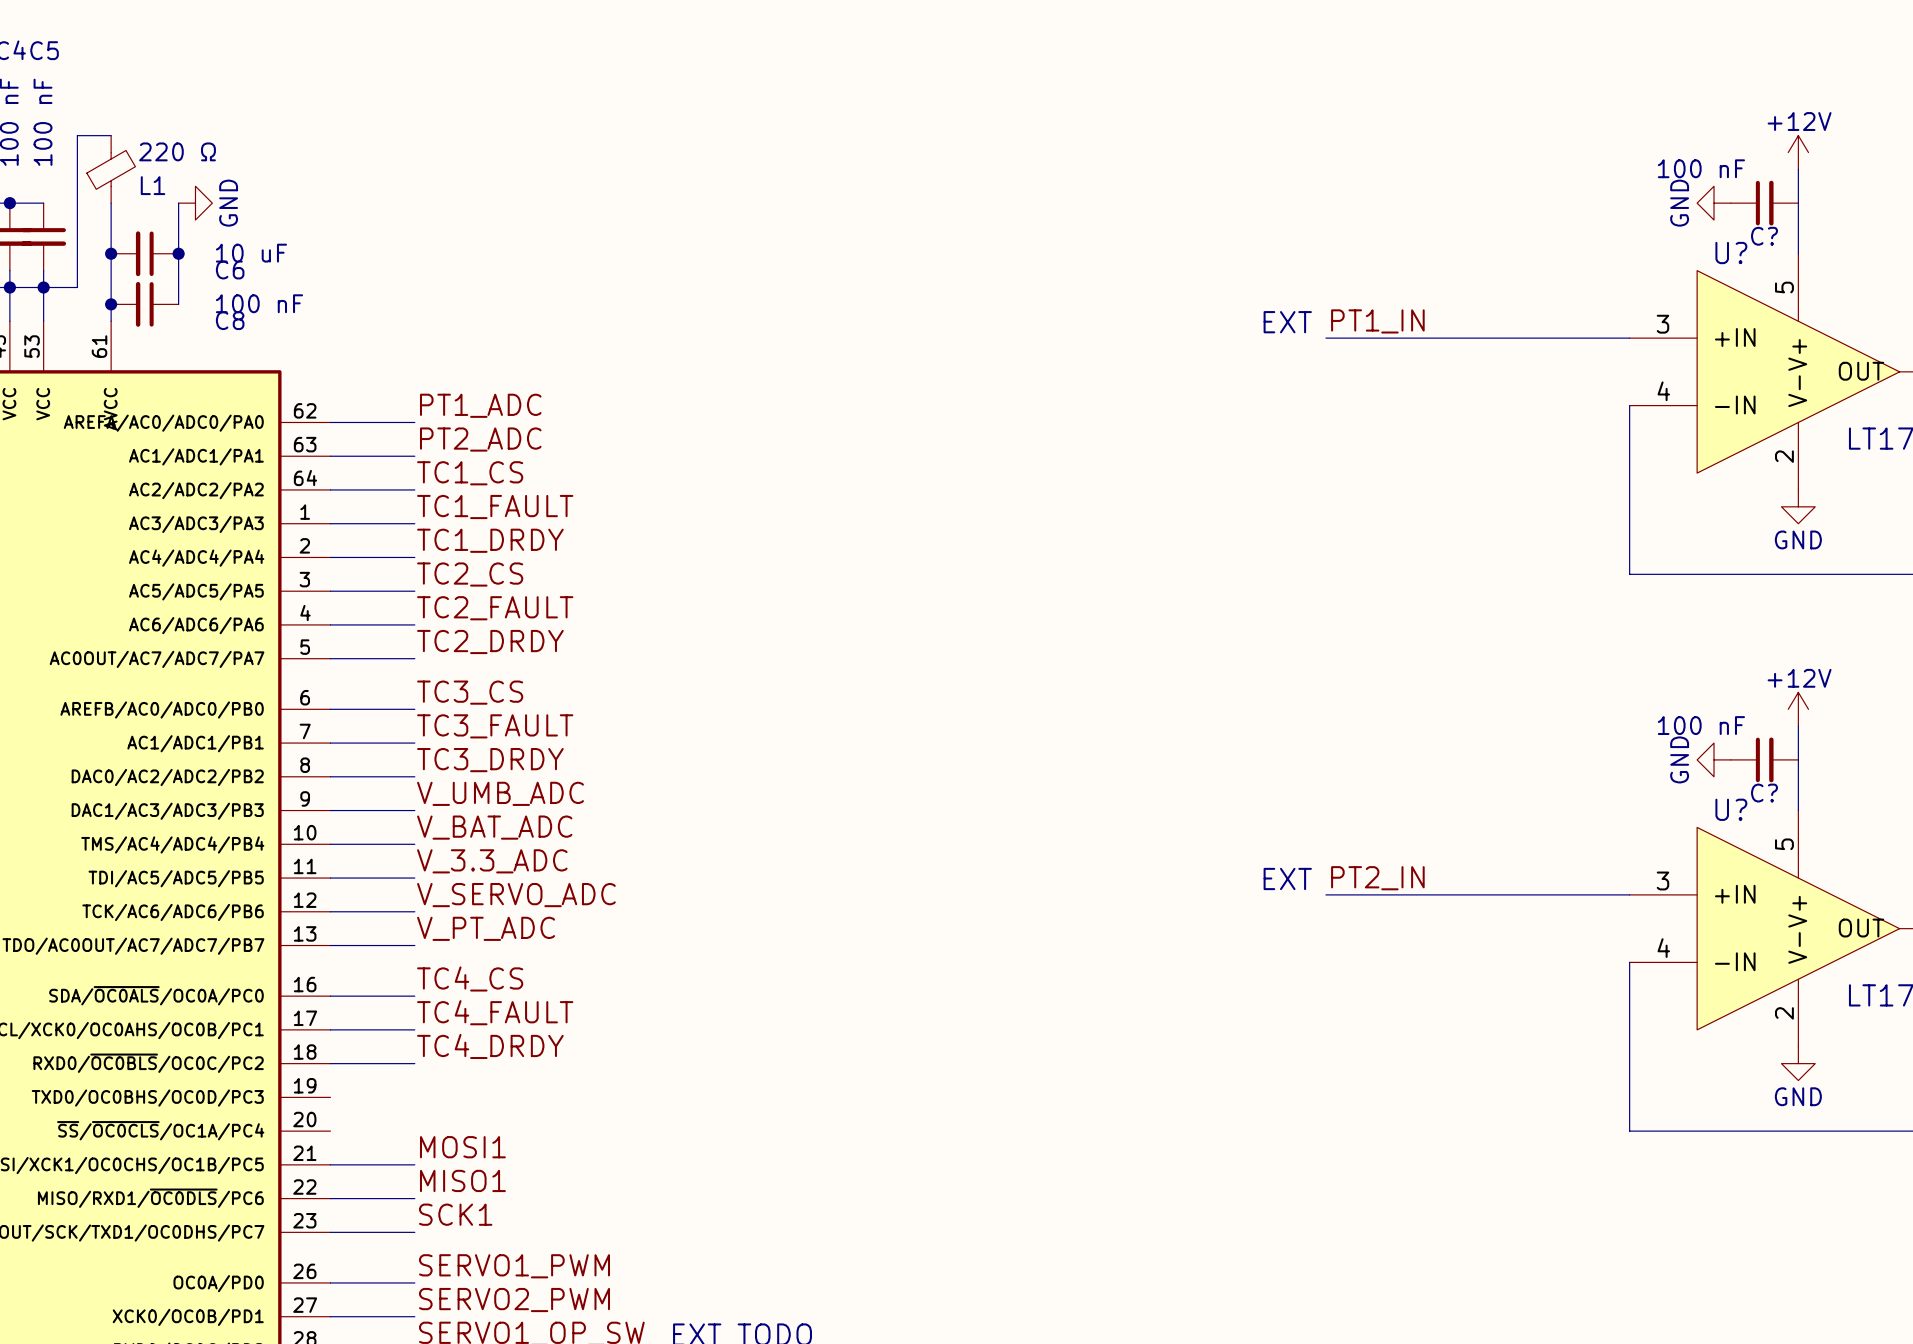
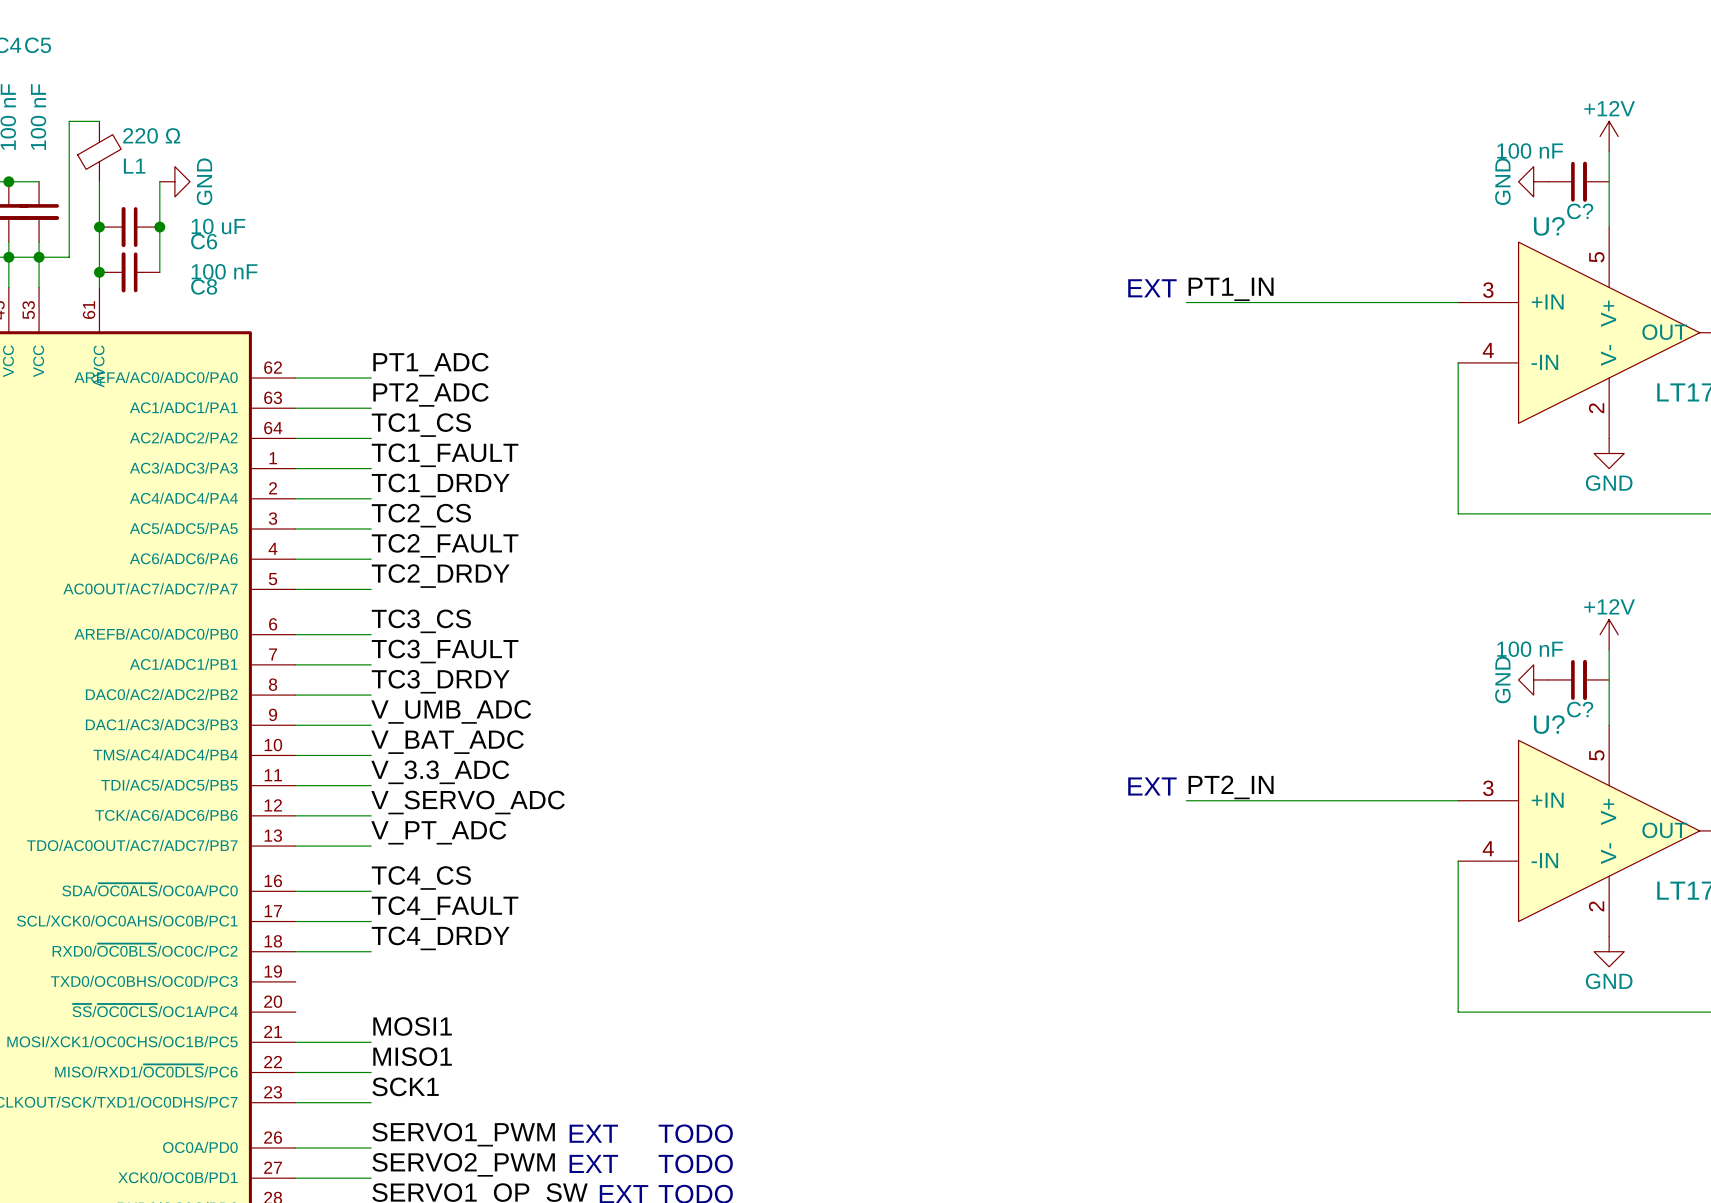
text: none -> EXT (593, 1133)
text: none -> TODO (695, 1133)
text: none -> EXT (593, 1163)
text: none -> TODO (695, 1163)

